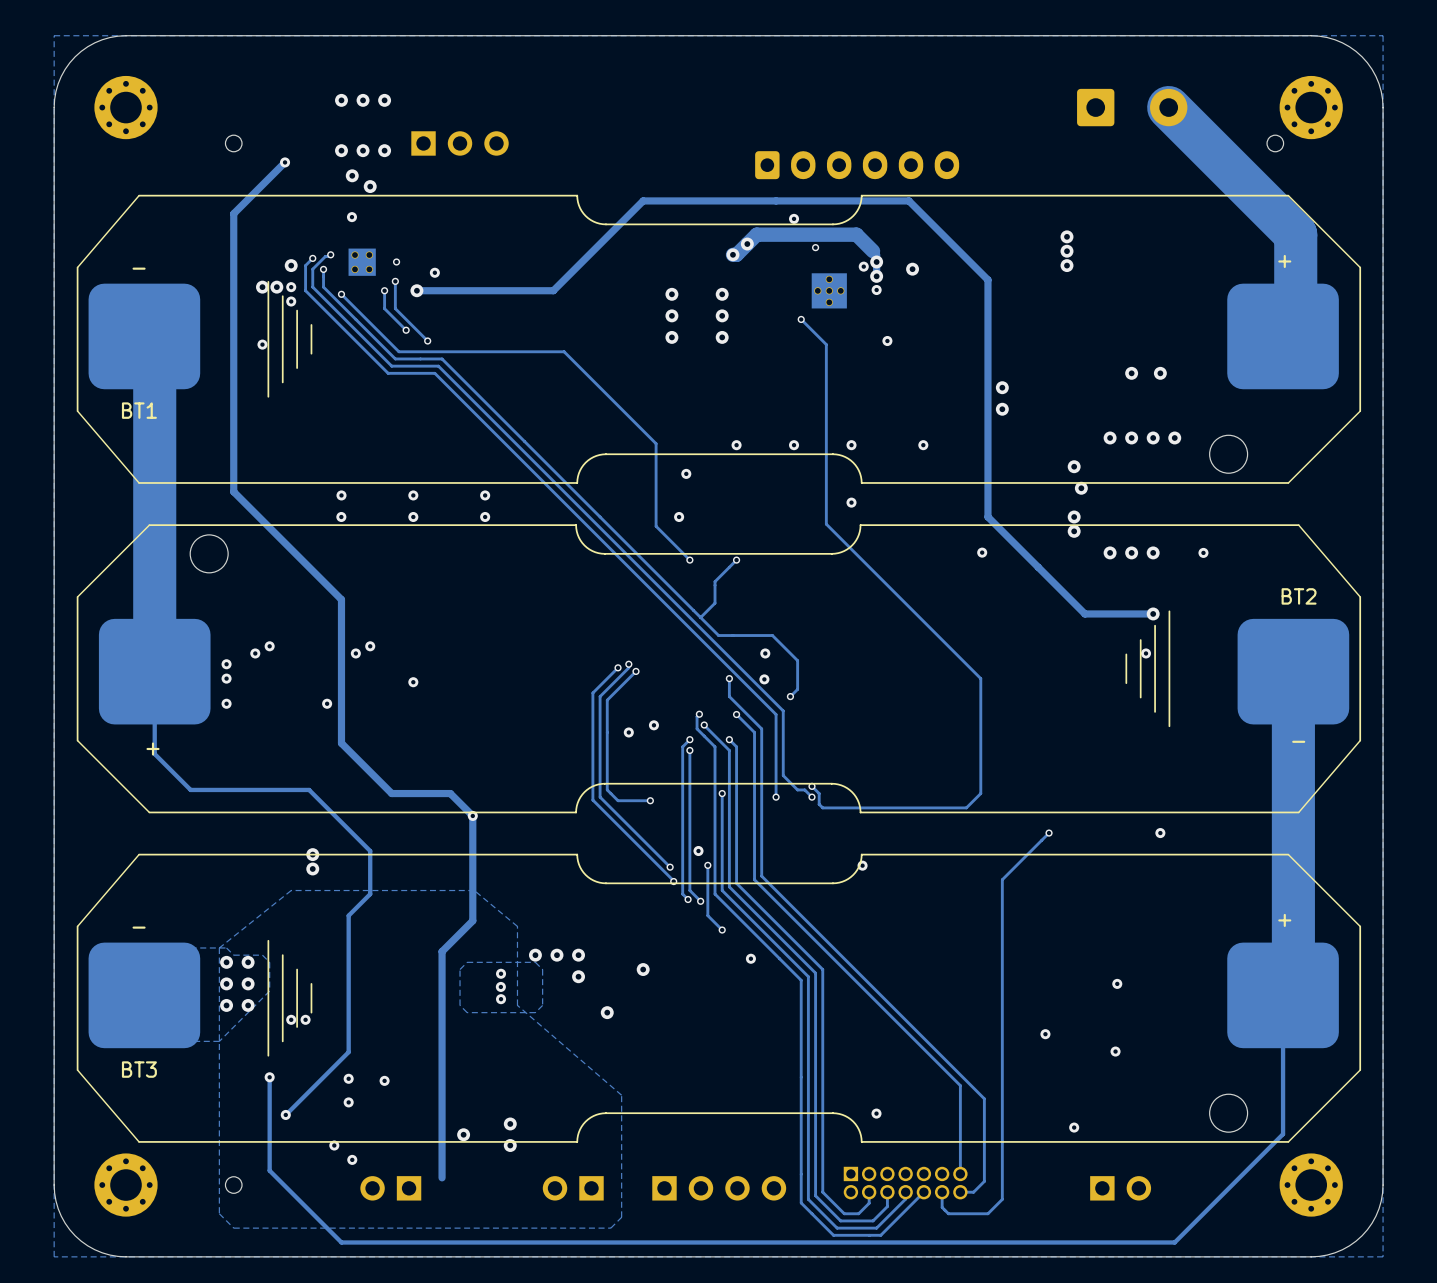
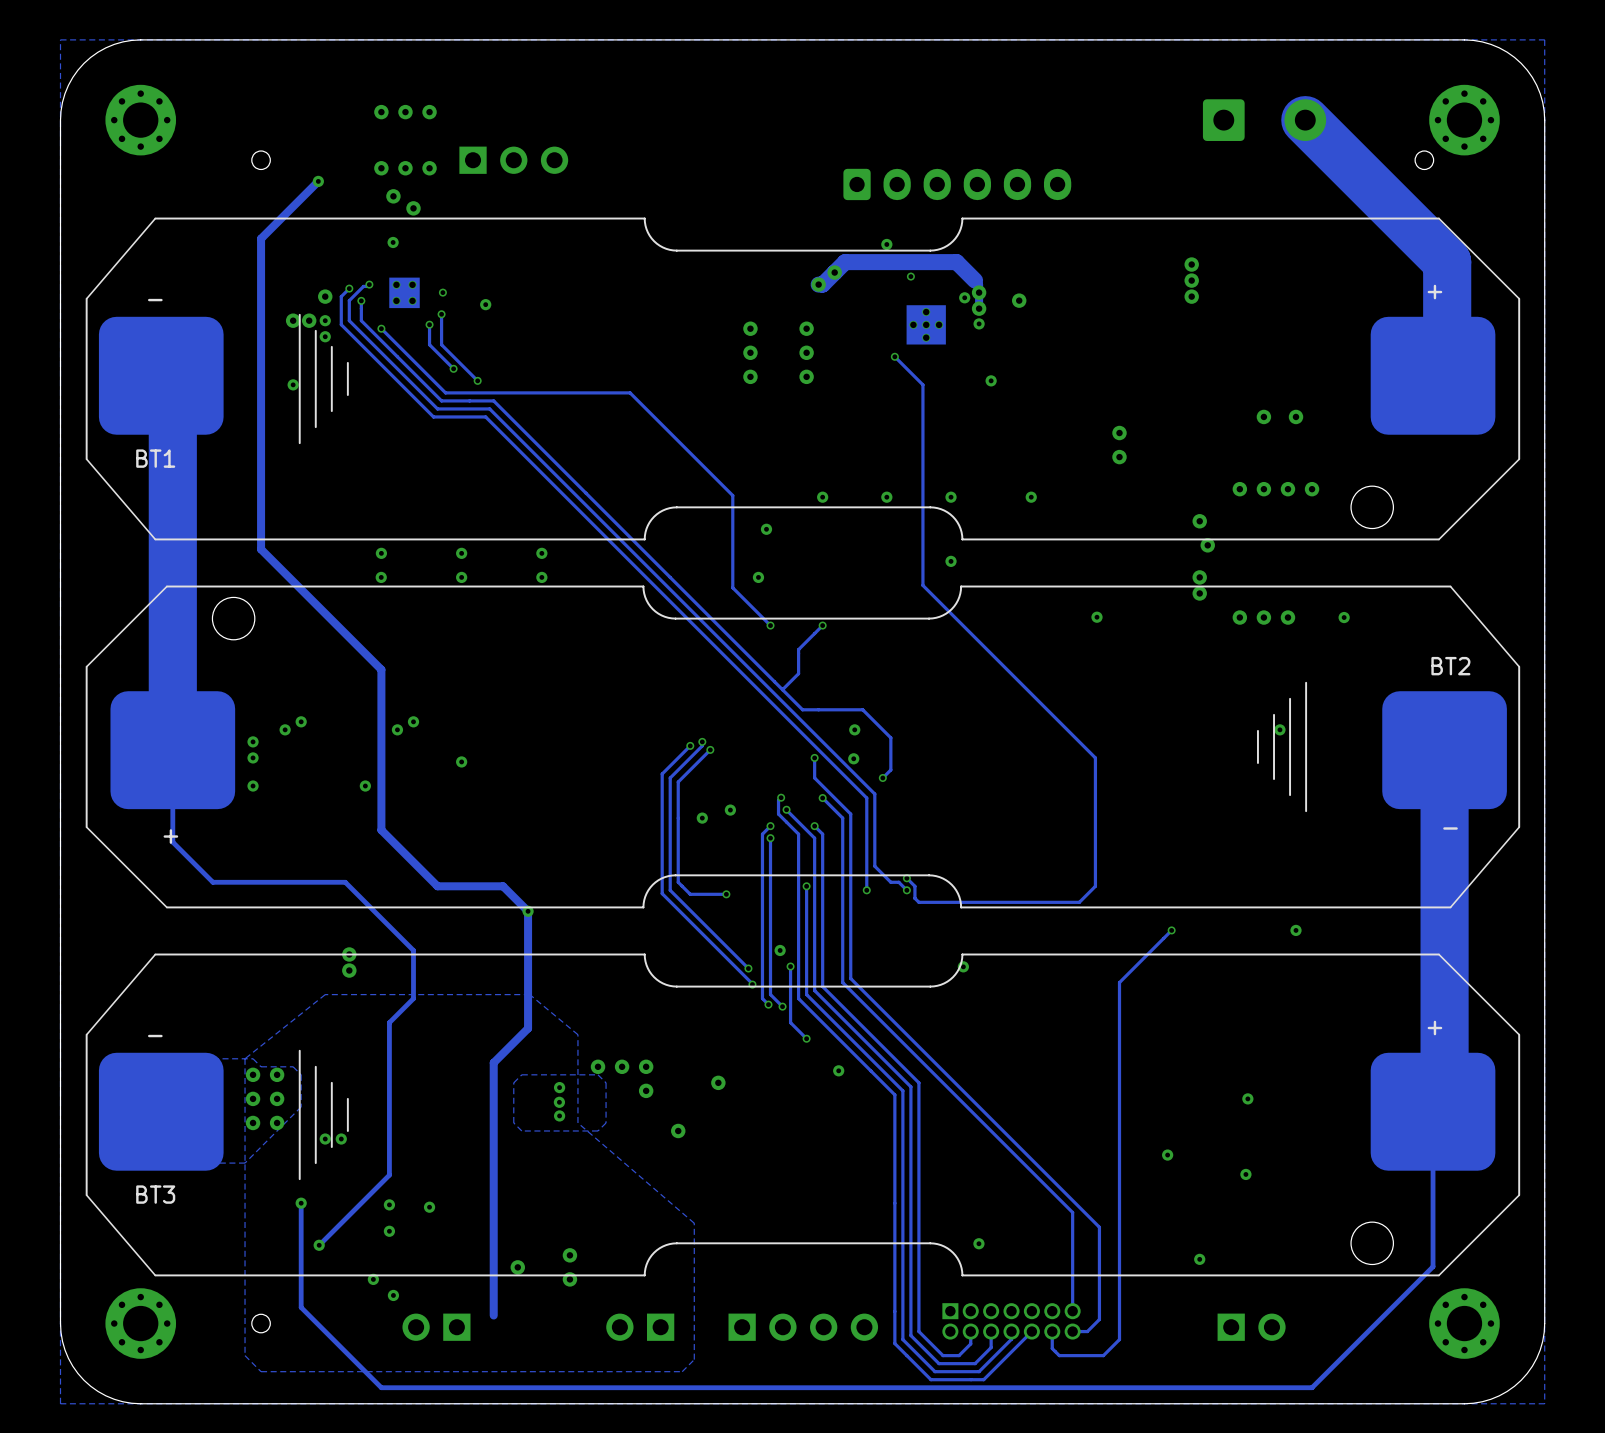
track: (416, 290) (553, 290) (643, 200) (908, 200) (987, 279) (987, 516) (1084, 613) (1153, 613) -> none
via: (416, 290) -> none
via: (1153, 613) -> none

